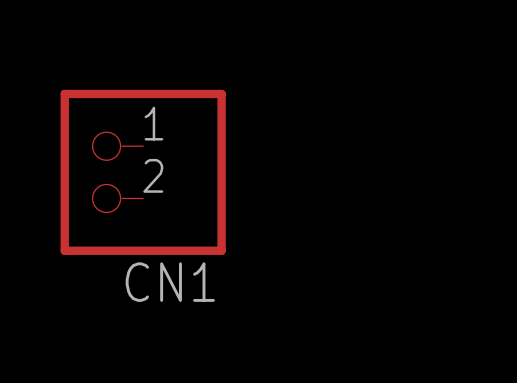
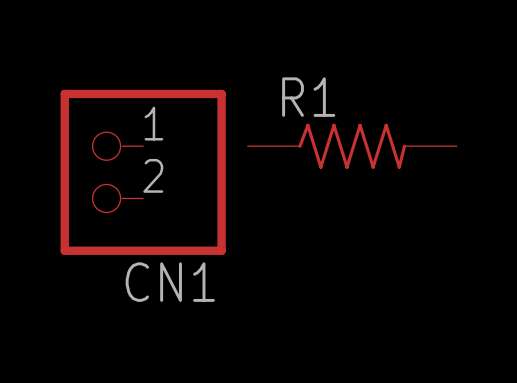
R1: none -> (352, 146)

